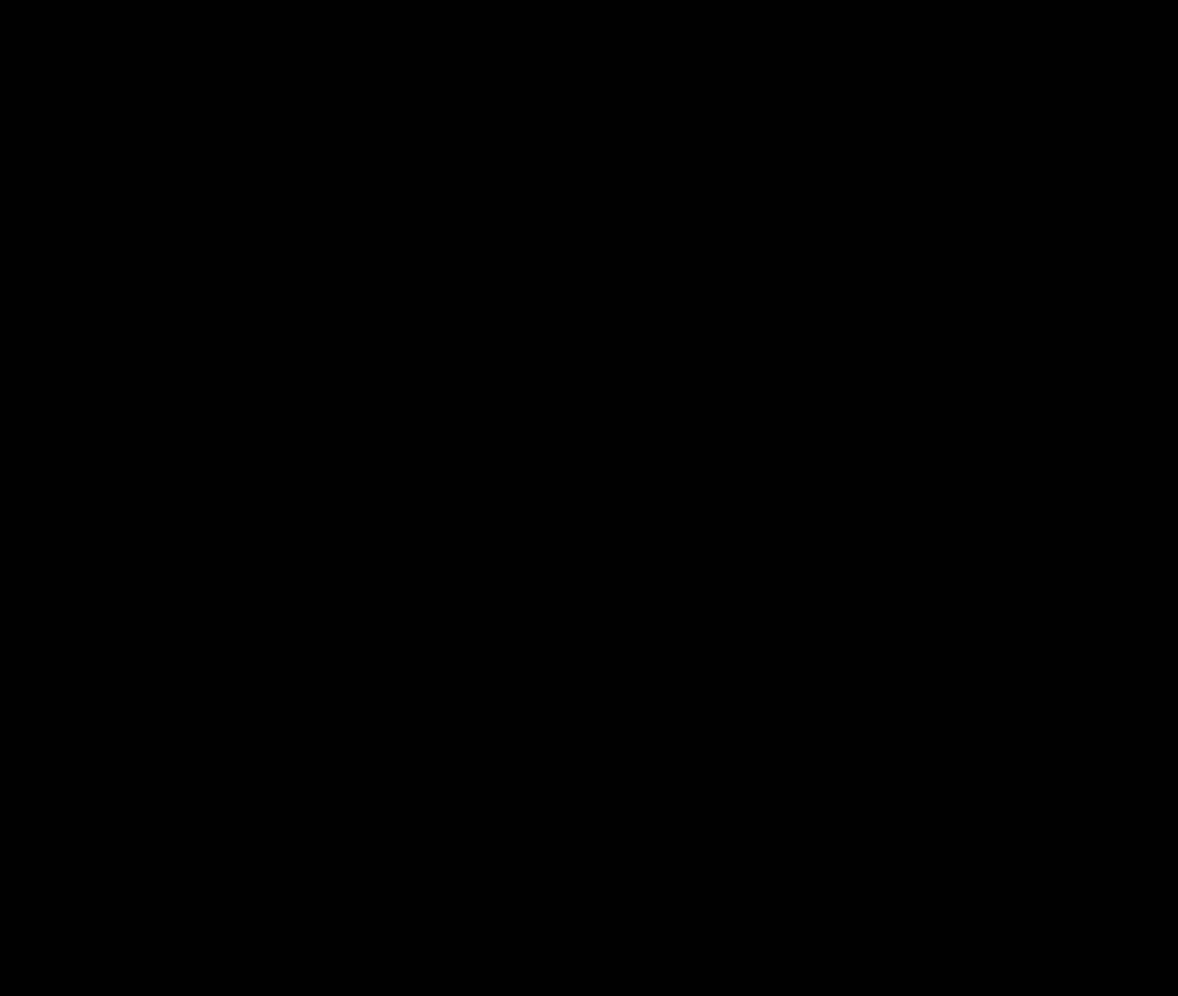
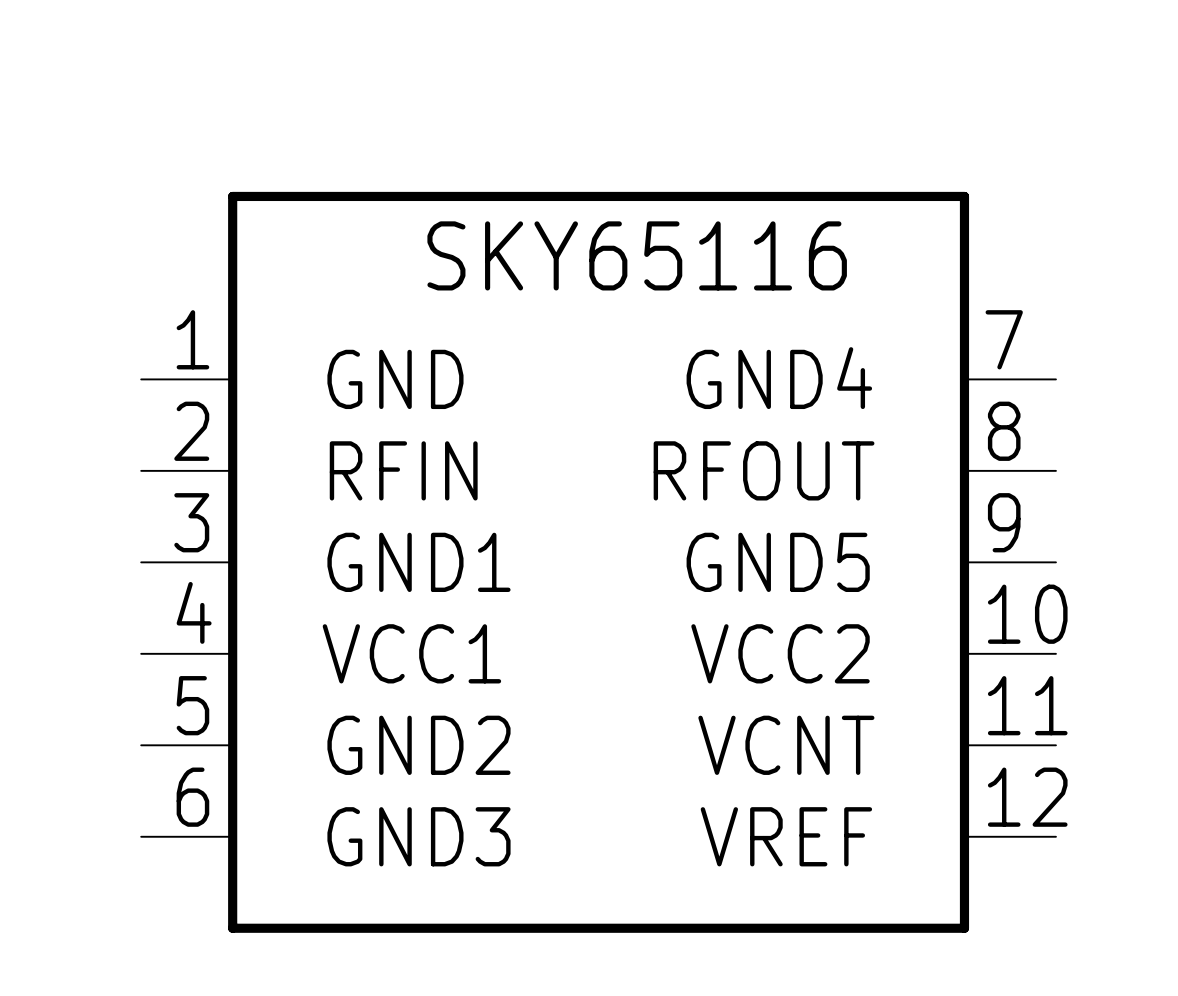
part: none -> (598, 562)

